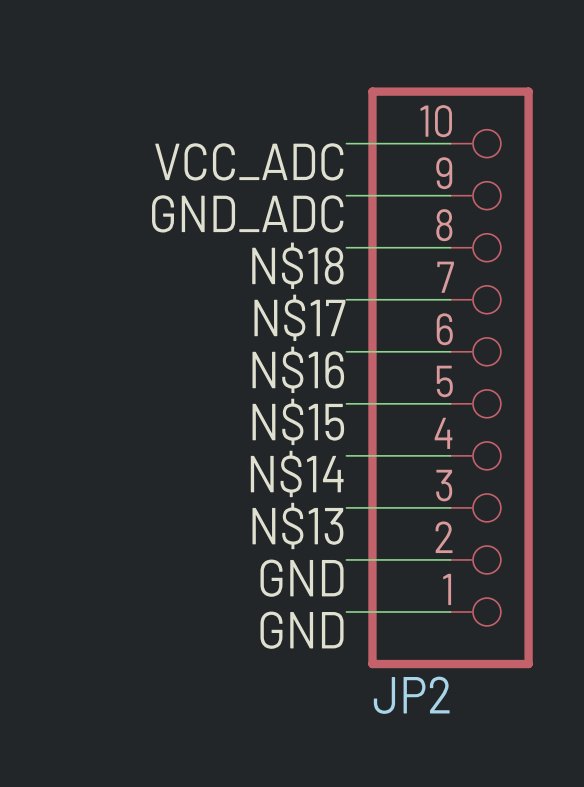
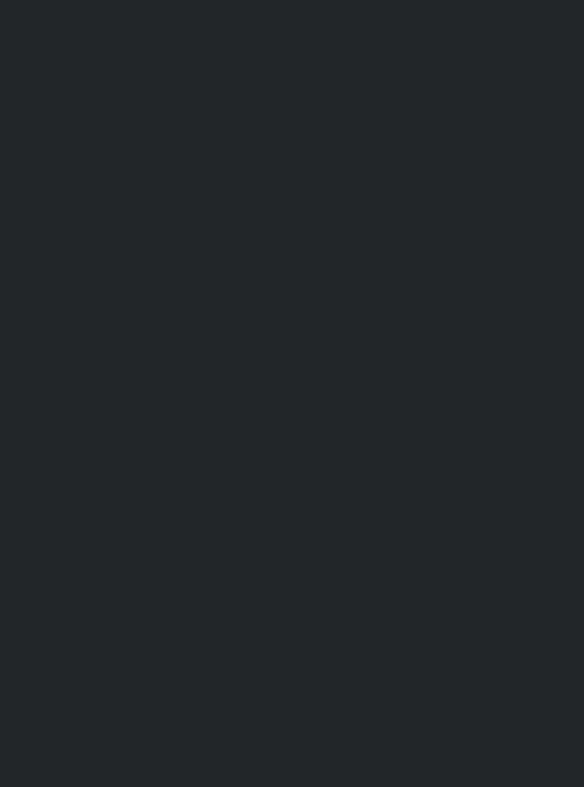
wire: (346, 143) (450, 143) -> none
label: VCC_ADC (249, 161) -> none
wire: (346, 195) (450, 195) -> none
label: GND_ADC (247, 213) -> none
wire: (346, 247) (450, 247) -> none
label: N$18 (297, 265) -> none
wire: (346, 299) (450, 299) -> none
label: N$17 (299, 317) -> none
wire: (346, 351) (450, 351) -> none
label: N$16 (298, 369) -> none
JP2: (450, 377) -> none
wire: (346, 403) (450, 403) -> none
label: N$15 (298, 421) -> none
wire: (346, 455) (450, 455) -> none
label: N$14 (297, 473) -> none
wire: (346, 507) (450, 507) -> none
label: N$13 (297, 525) -> none
wire: (346, 559) (450, 559) -> none
label: GND (302, 578) -> none
wire: (346, 611) (450, 611) -> none
label: GND (302, 630) -> none

